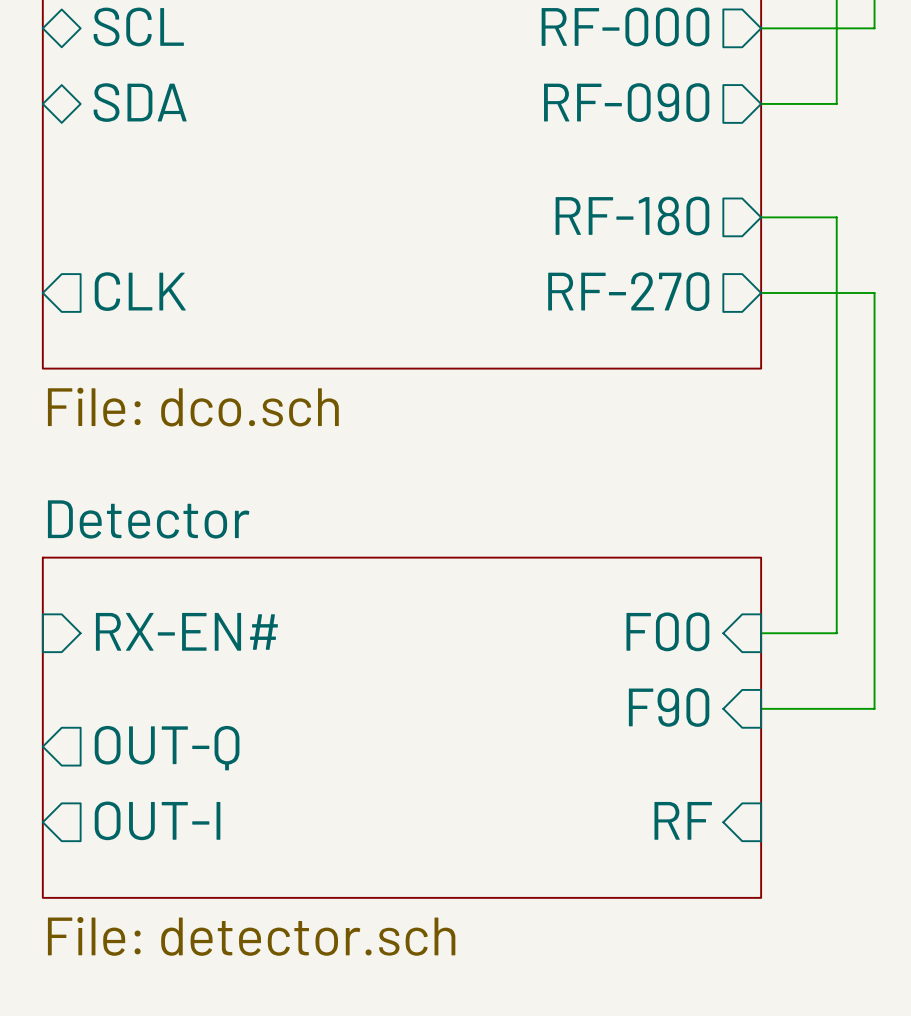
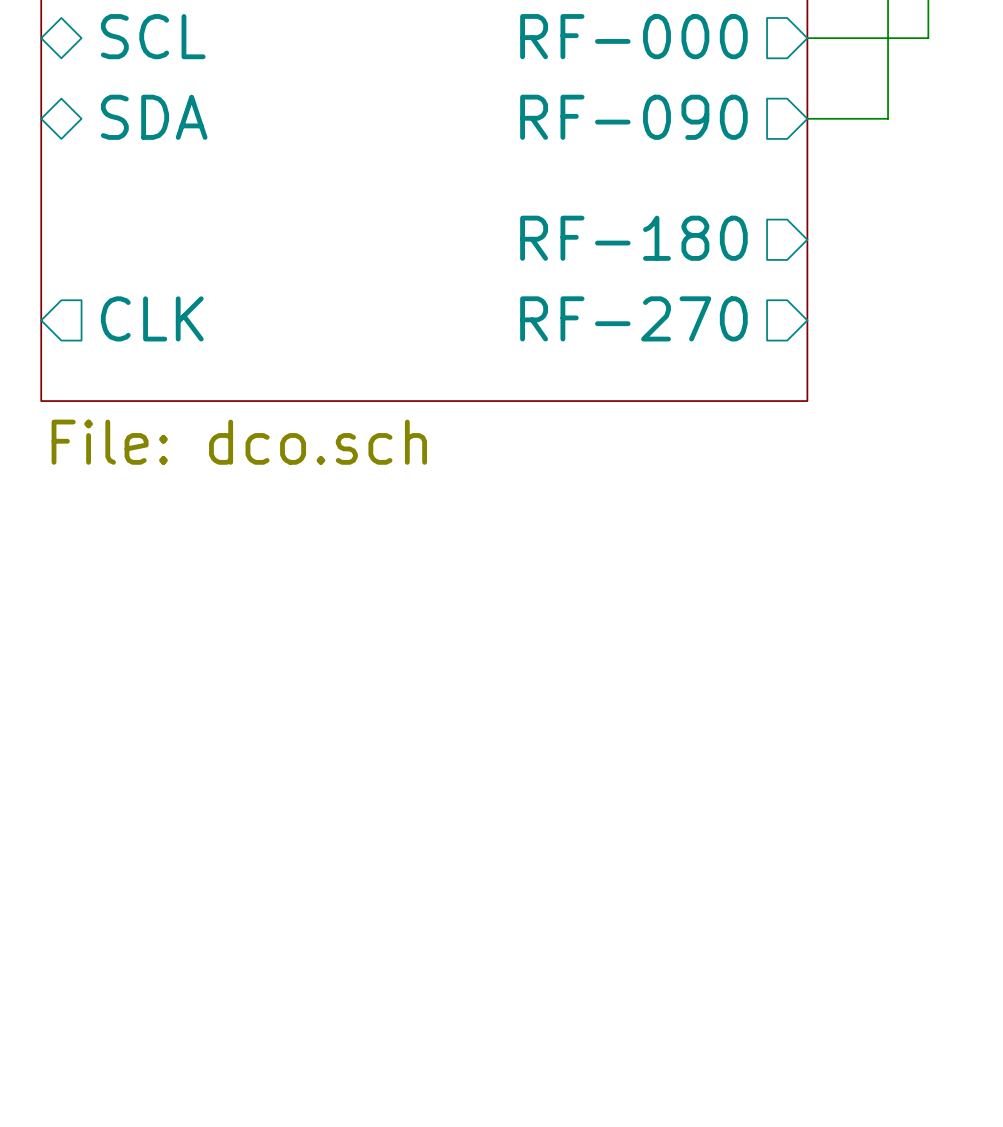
wire: (761, 217) (836, 217) (836, 633) (761, 633) -> none
wire: (761, 292) (874, 292) (874, 708) (761, 708) -> none
sheet pin: RX-EN# (186, 631) -> none
sheet pin: F00 (667, 631) -> none
sheet pin: F90 (669, 707) -> none
sheet Detector: File: detector.sch (401, 727) -> none
sheet pin: OUT-Q (167, 748) -> none
sheet pin: OUT-I (157, 820) -> none
sheet pin: RF (683, 820) -> none

